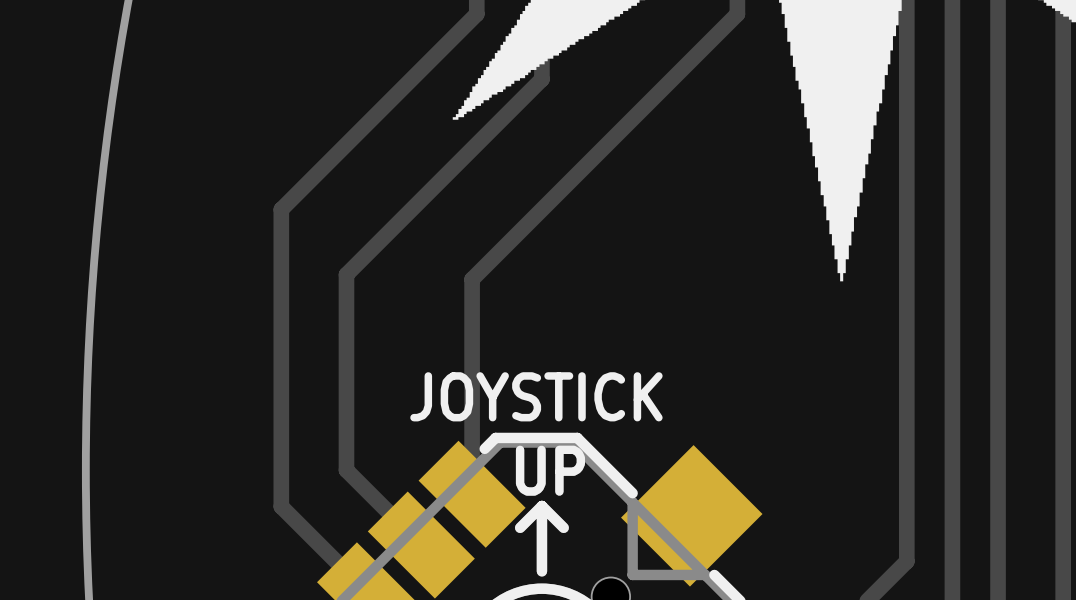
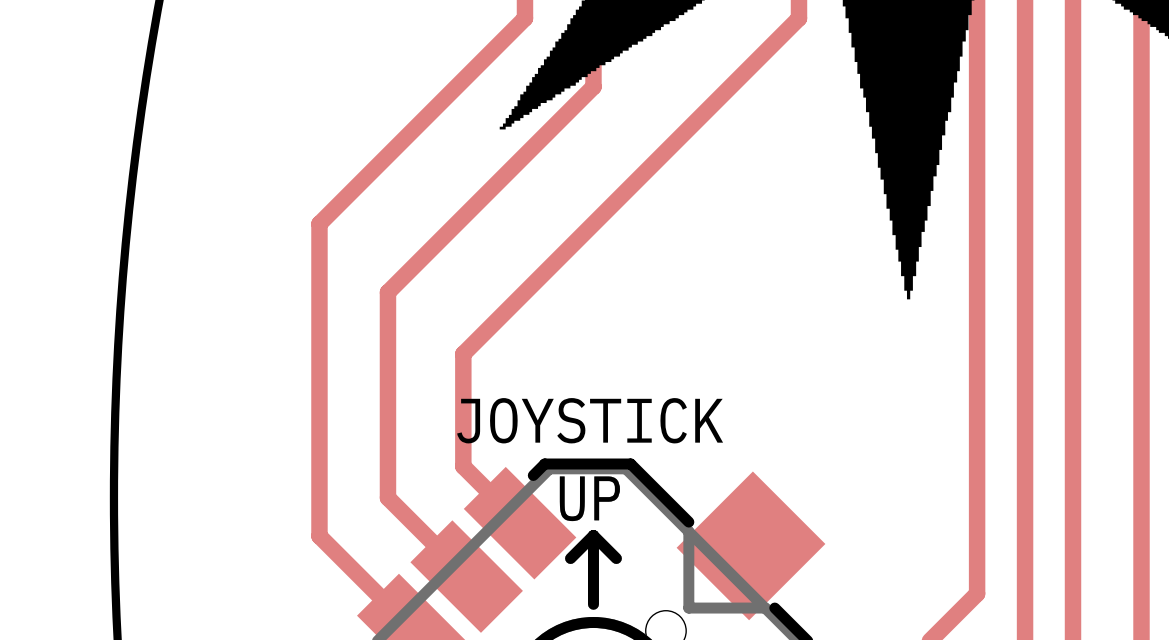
track: (472, 279) (472, 494) -> (520, 297) (463, 354) (463, 466) (520, 523)

